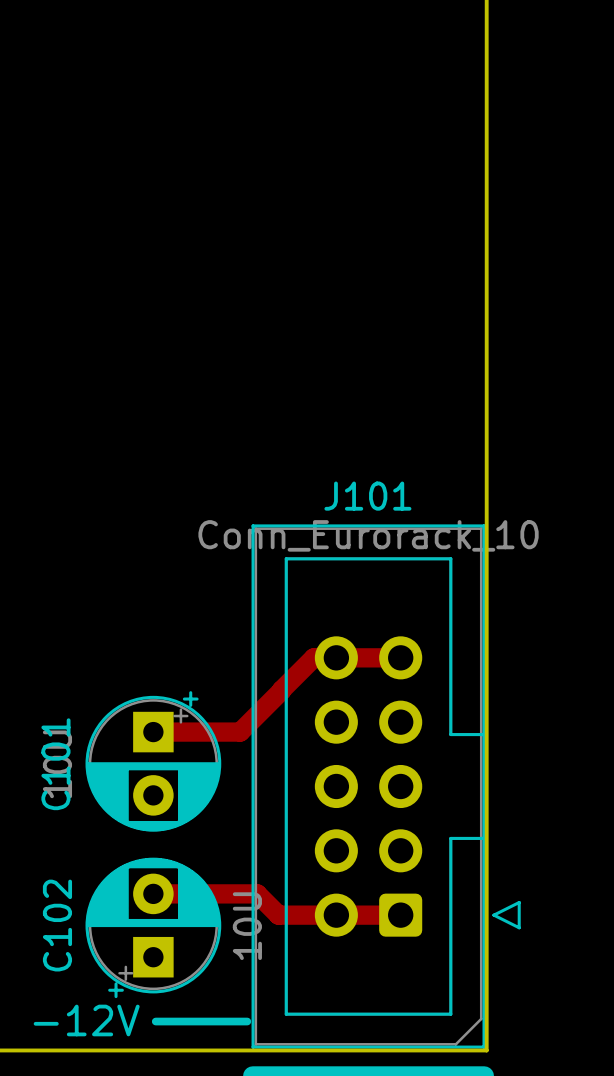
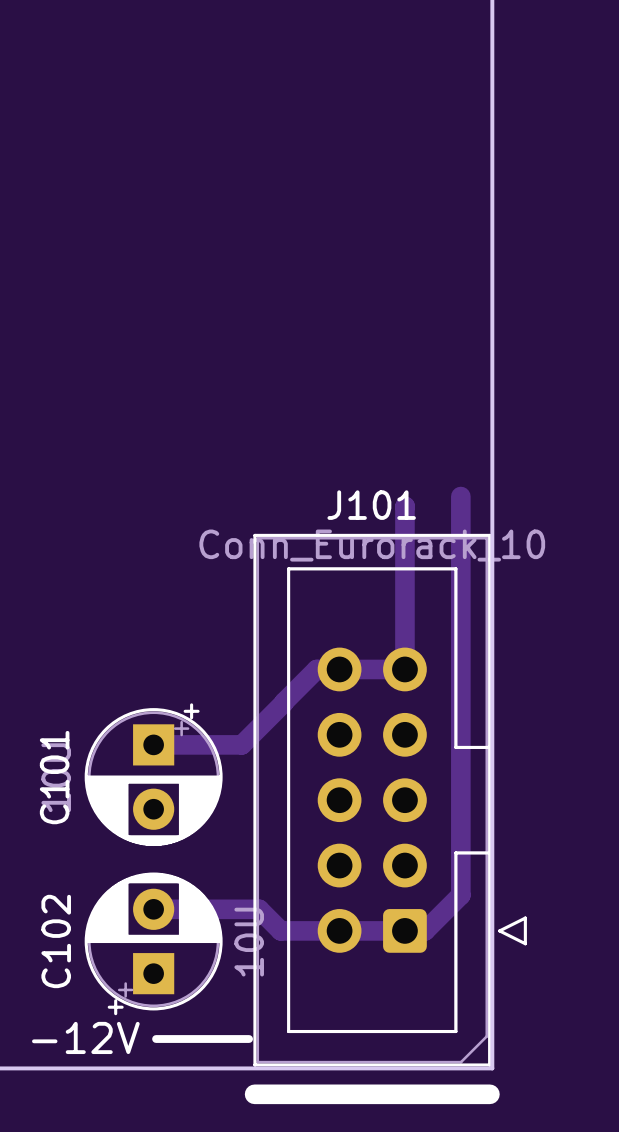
track: none -> (460, 496) (460, 895) (425, 930) (404, 930)
track: none -> (404, 506) (404, 669)

